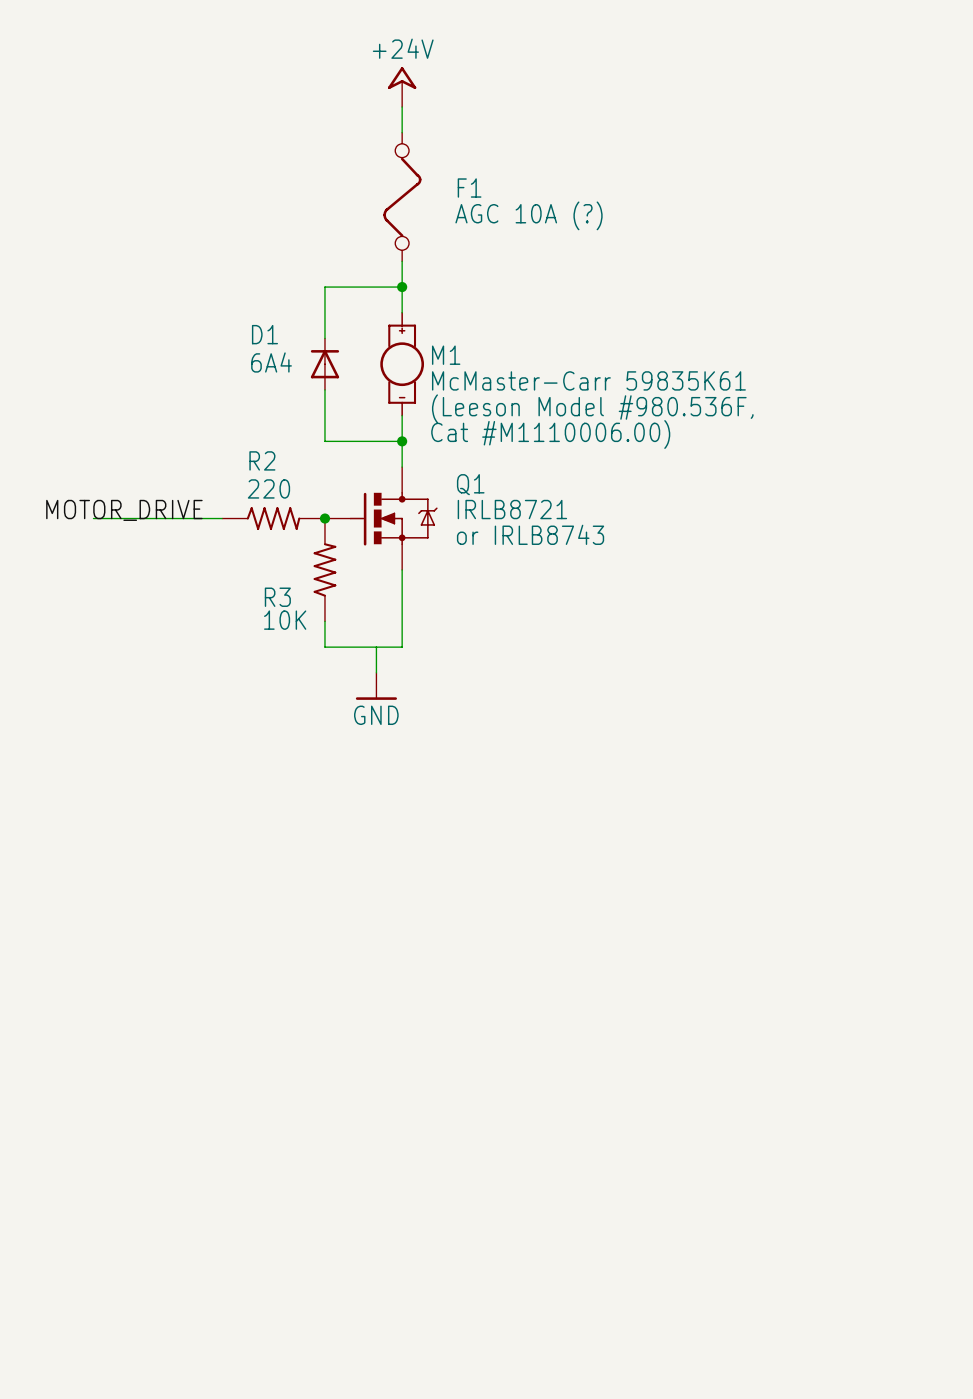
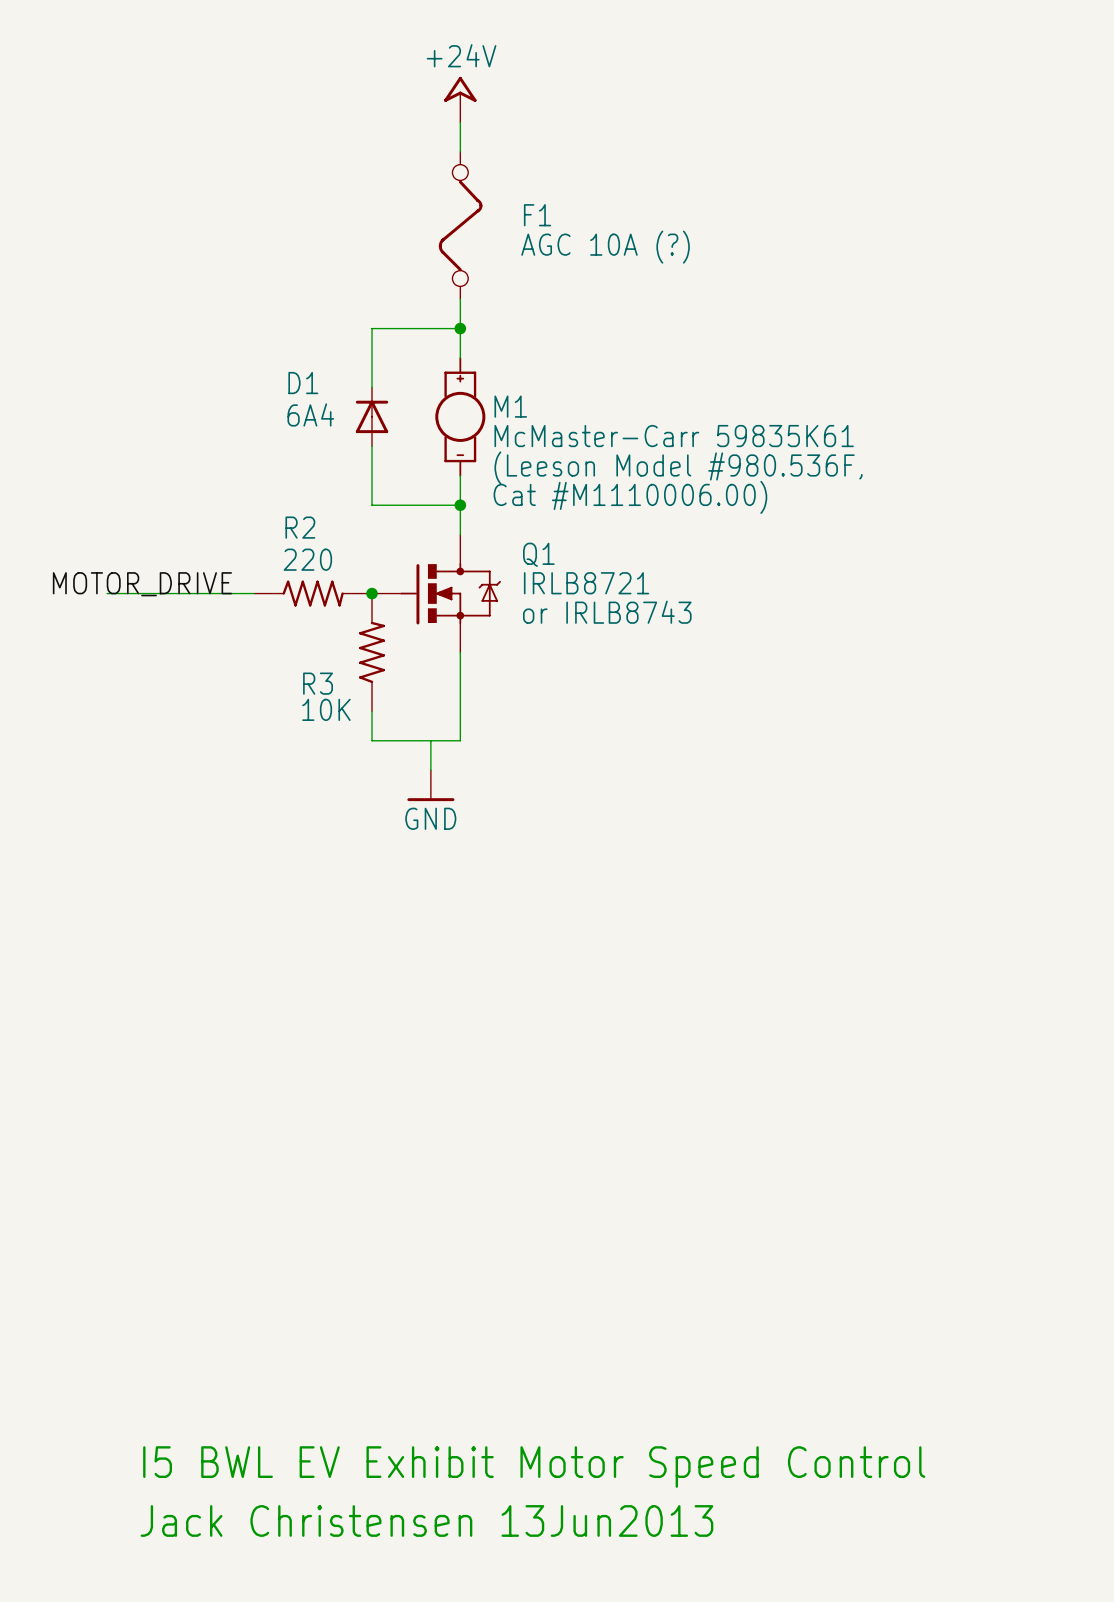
text: none -> I5 BWL EV Exhibit Motor Speed Control (534, 1466)
text: none -> Jack Christensen 13Jun2013 (426, 1520)

